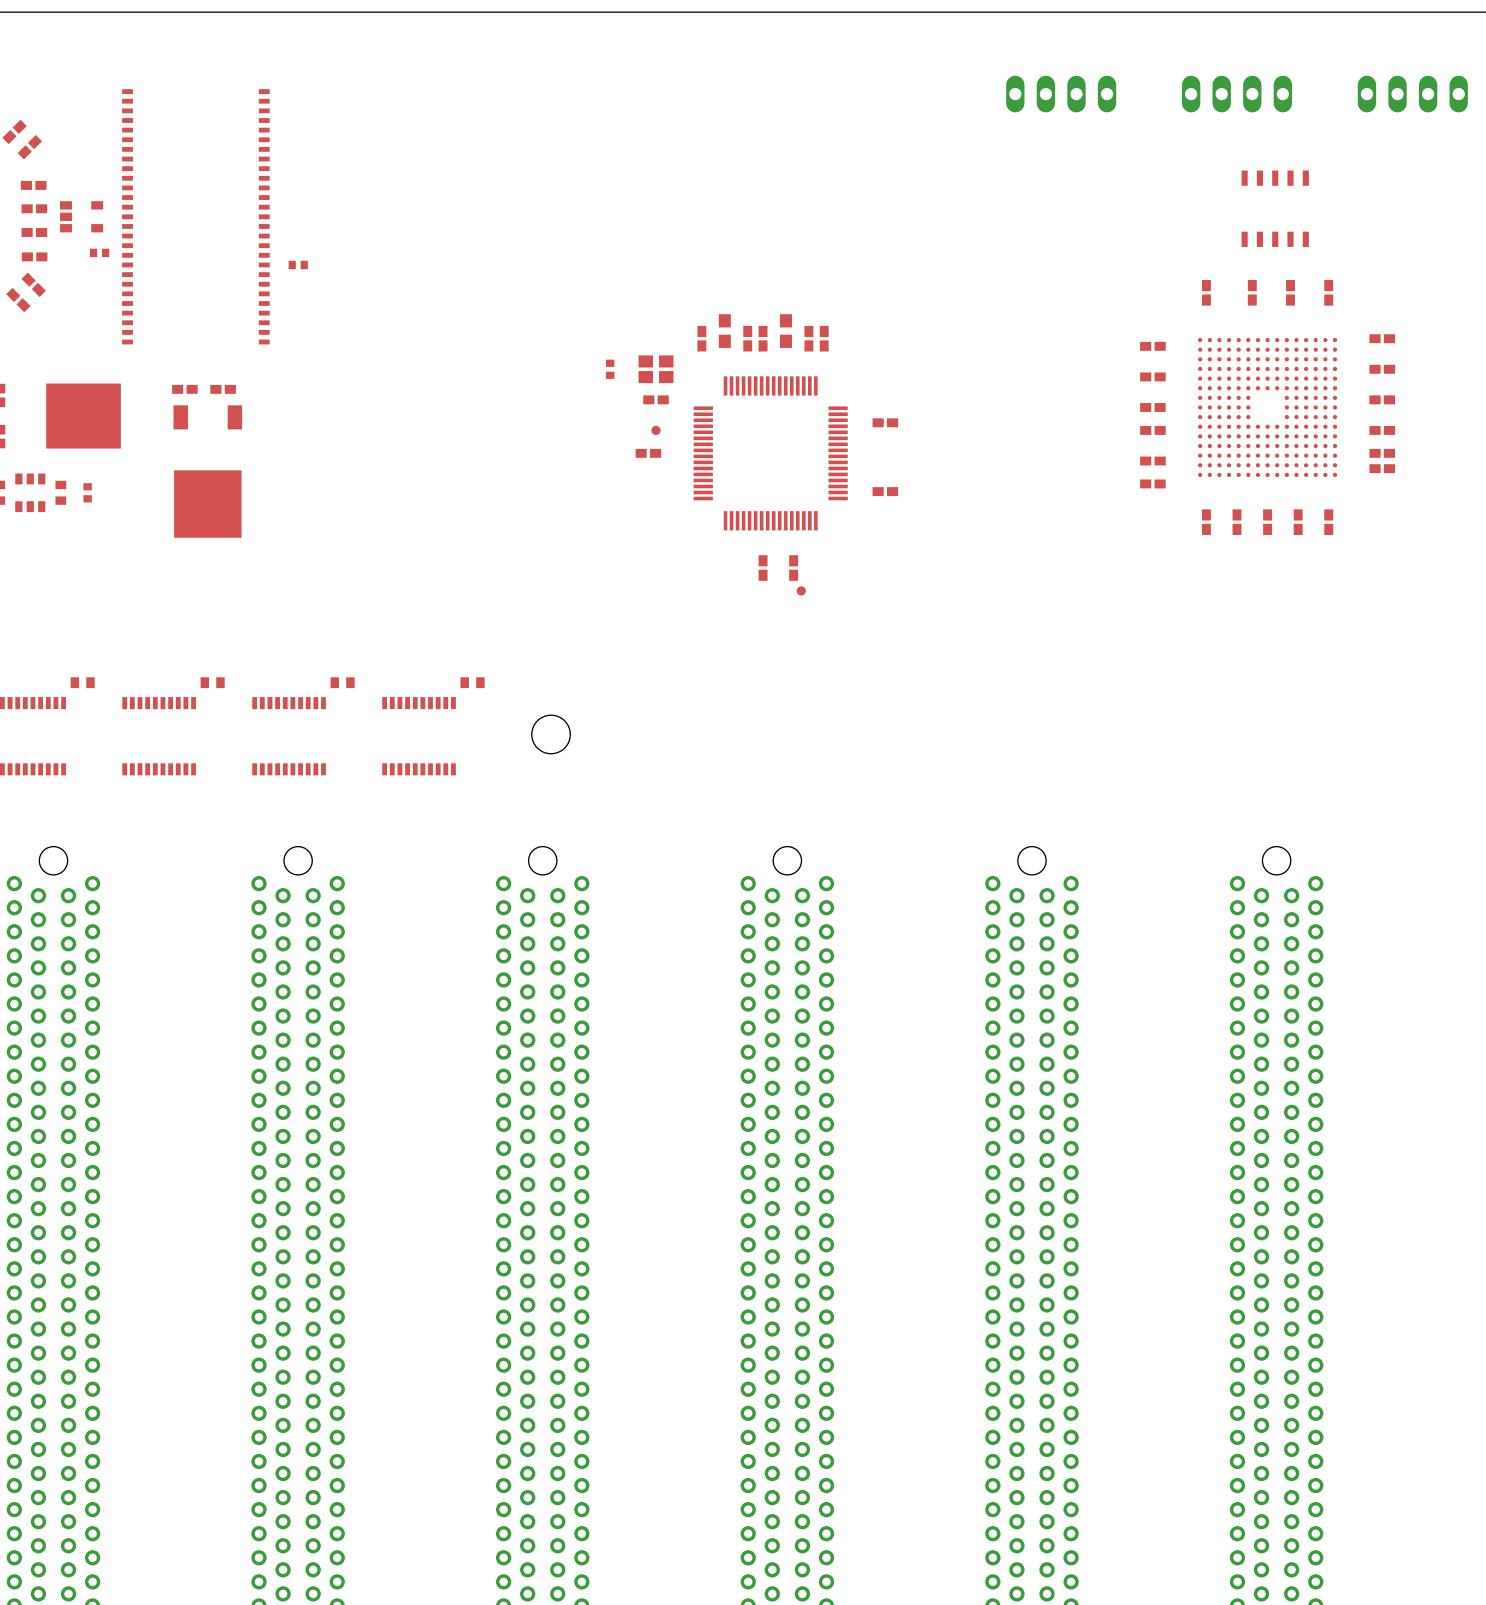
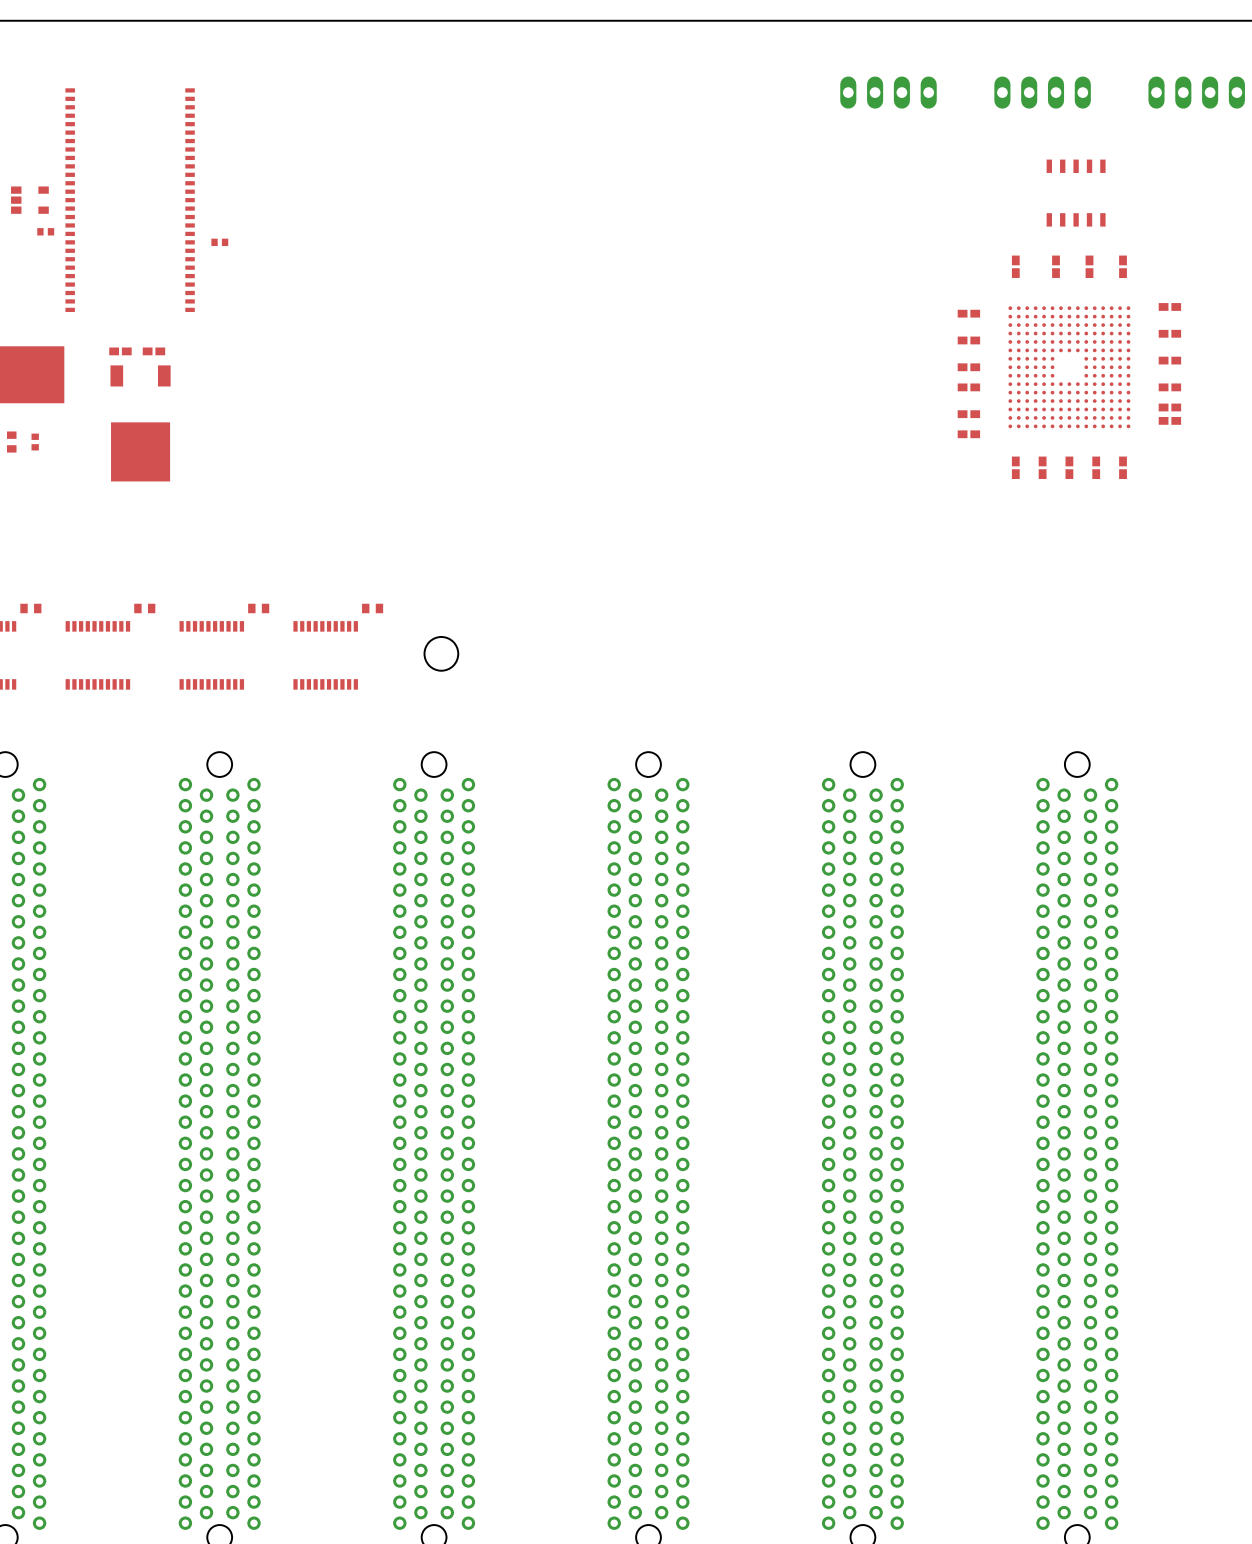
part: (724, 331) -> none
part: (785, 331) -> none
part: (701, 338) -> none
part: (747, 338) -> none
part: (763, 338) -> none
part: (808, 338) -> none
part: (824, 338) -> none
part: (610, 369) -> none
part: (656, 369) -> none
part: (656, 399) -> none
part: (885, 422) -> none
part: (656, 430) -> none
part: (648, 453) -> none
part: (770, 453) -> none
part: (885, 491) -> none
part: (763, 568) -> none
part: (793, 568) -> none
part: (801, 590) -> none

